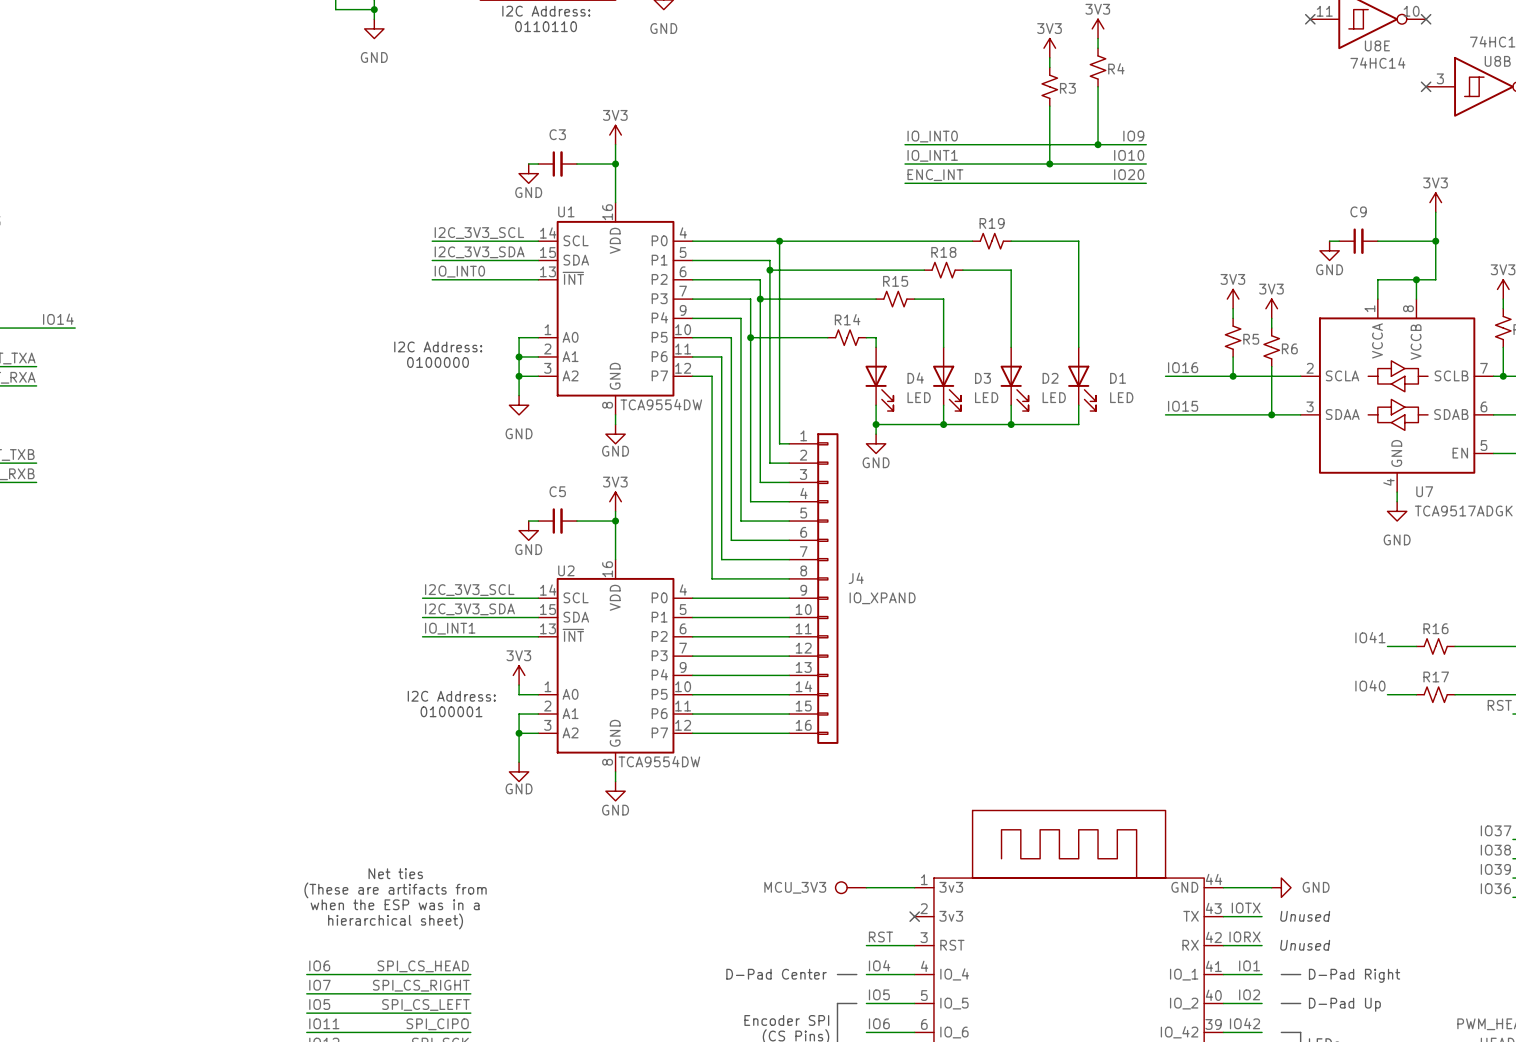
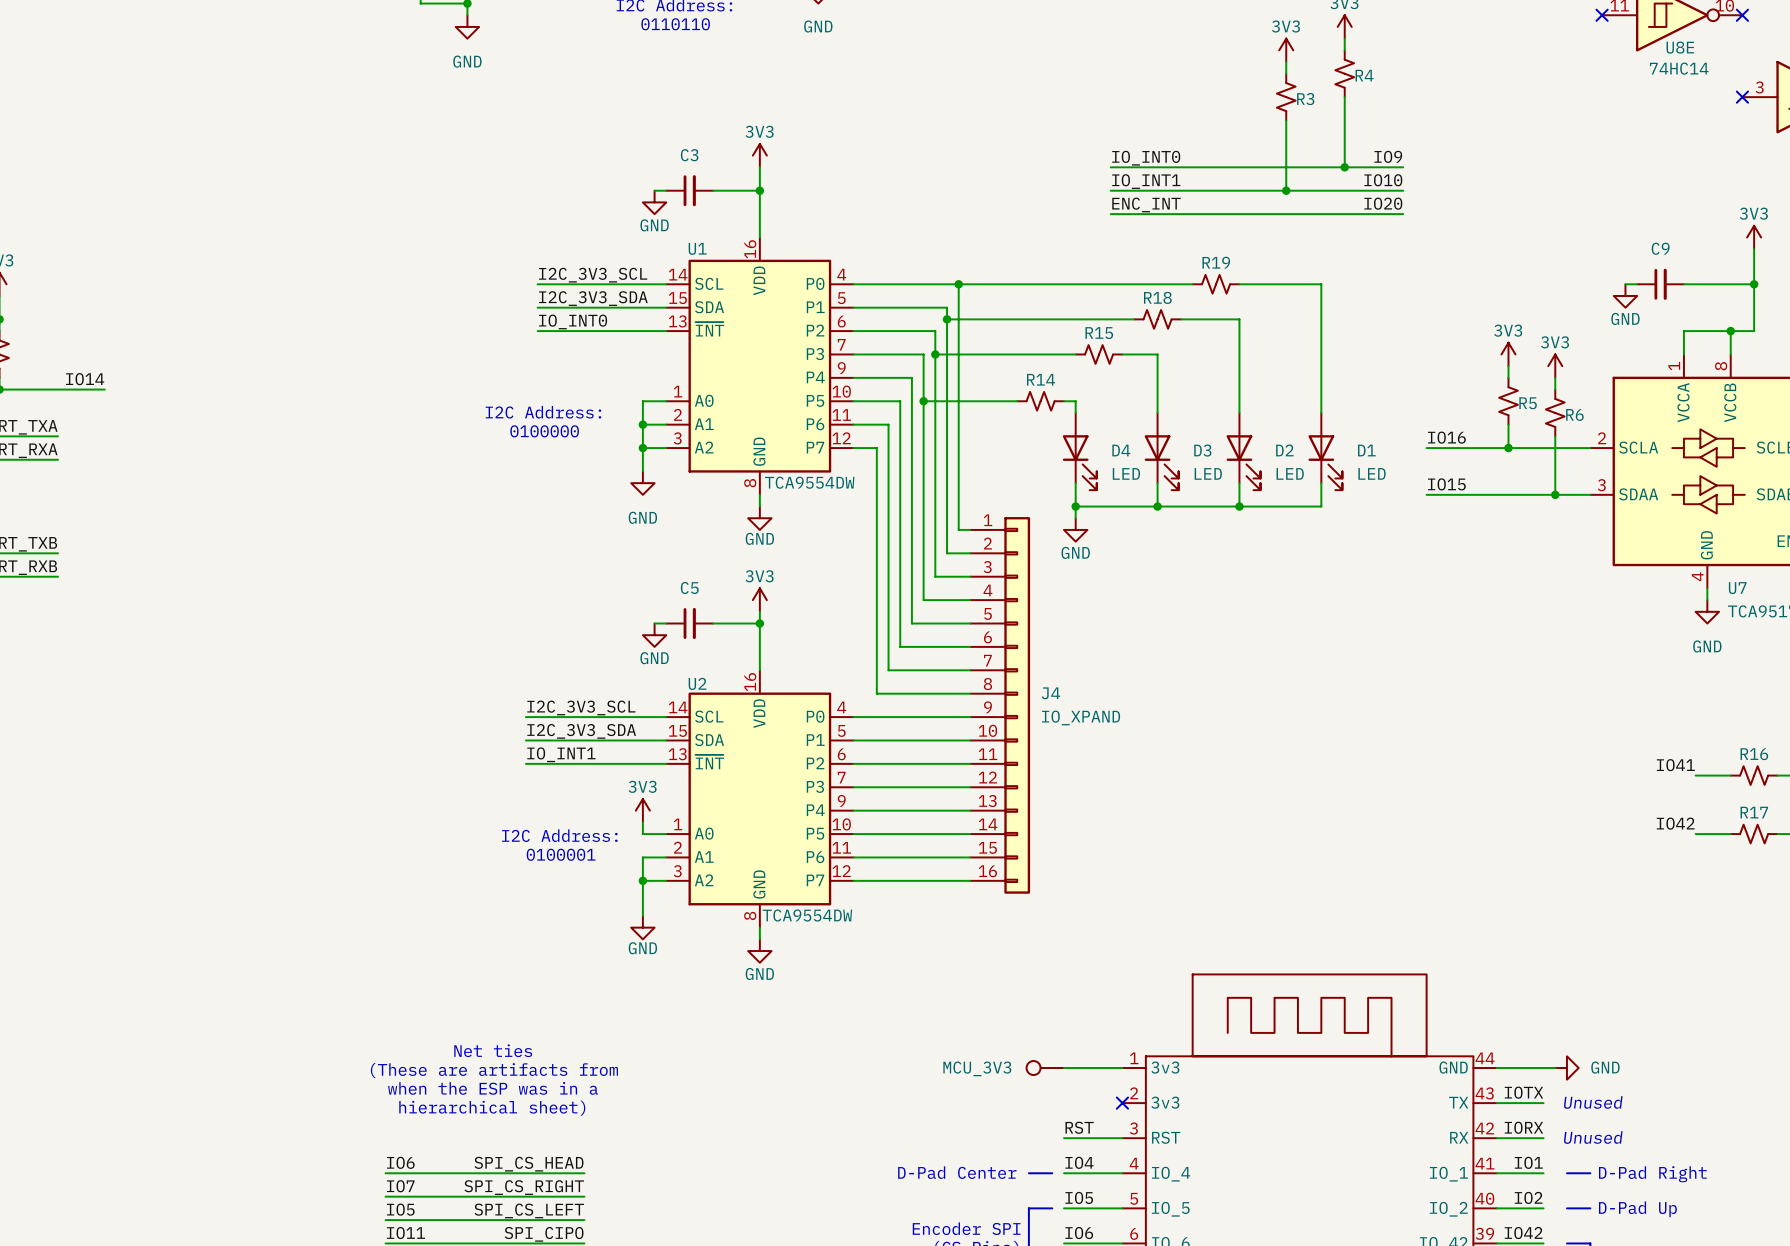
label: IO40 (1370, 685) -> IO42 (1675, 823)

